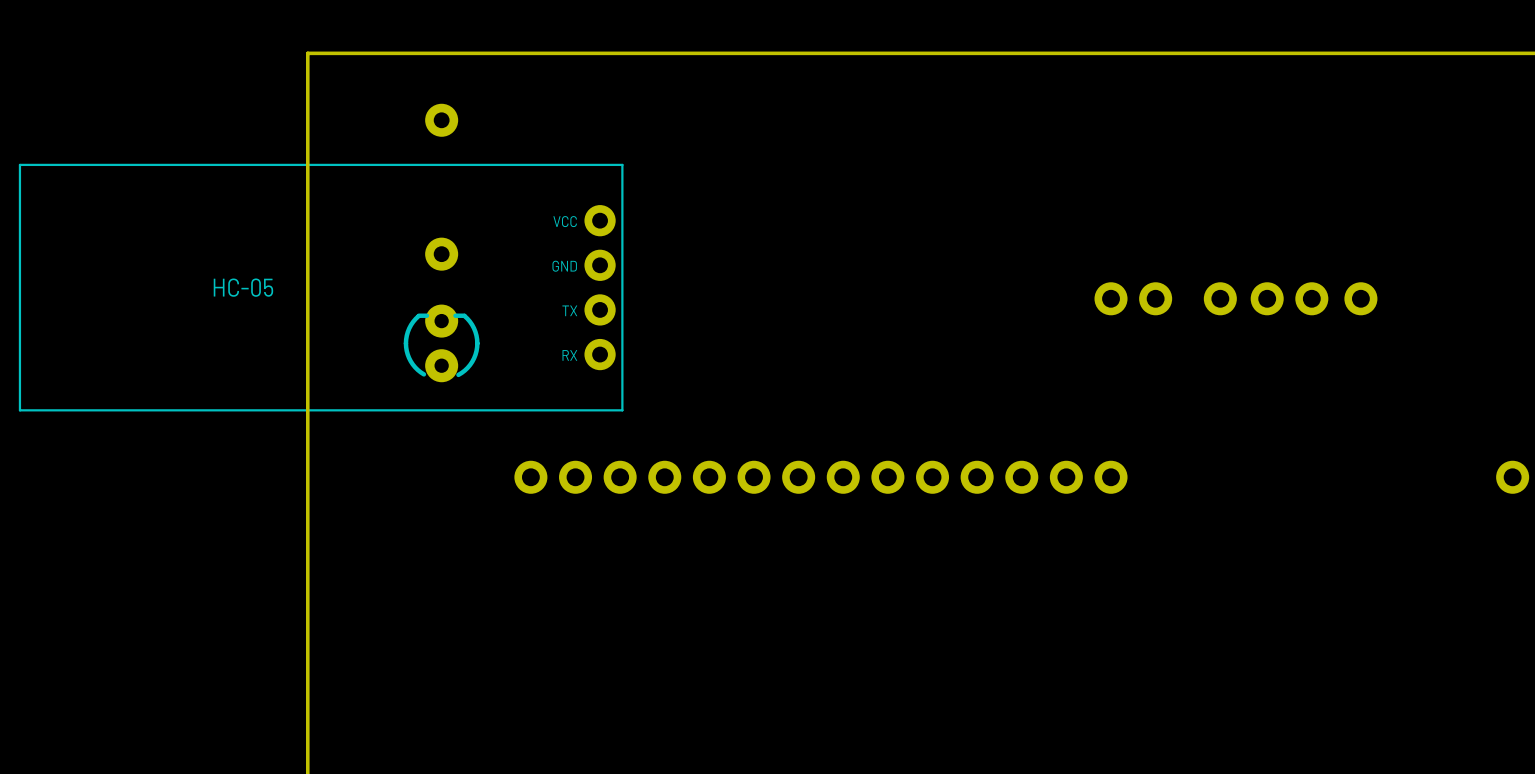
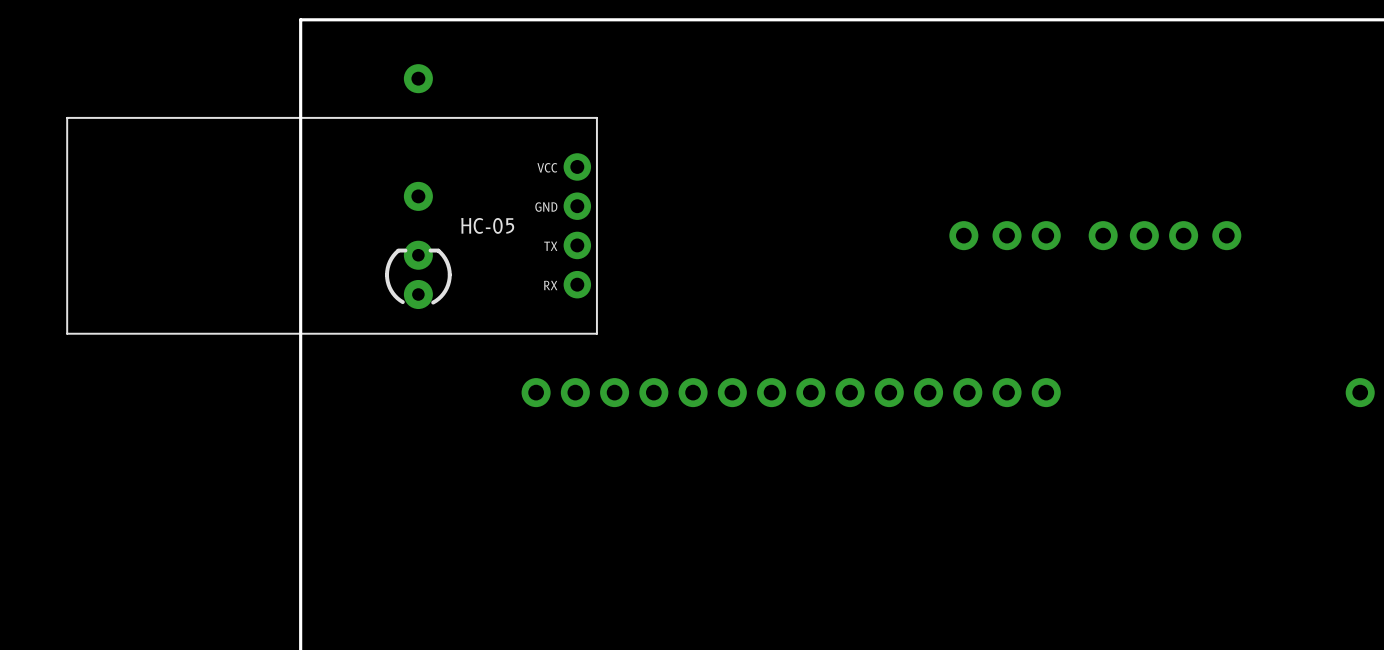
HC-05 name position: HC-05 (243, 287) -> HC-05 (487, 225)
HC-05 position: (321, 287) -> (332, 225)
part: none -> (963, 235)
part position: (530, 477) -> (536, 392)
part position: (843, 477) -> (810, 392)

